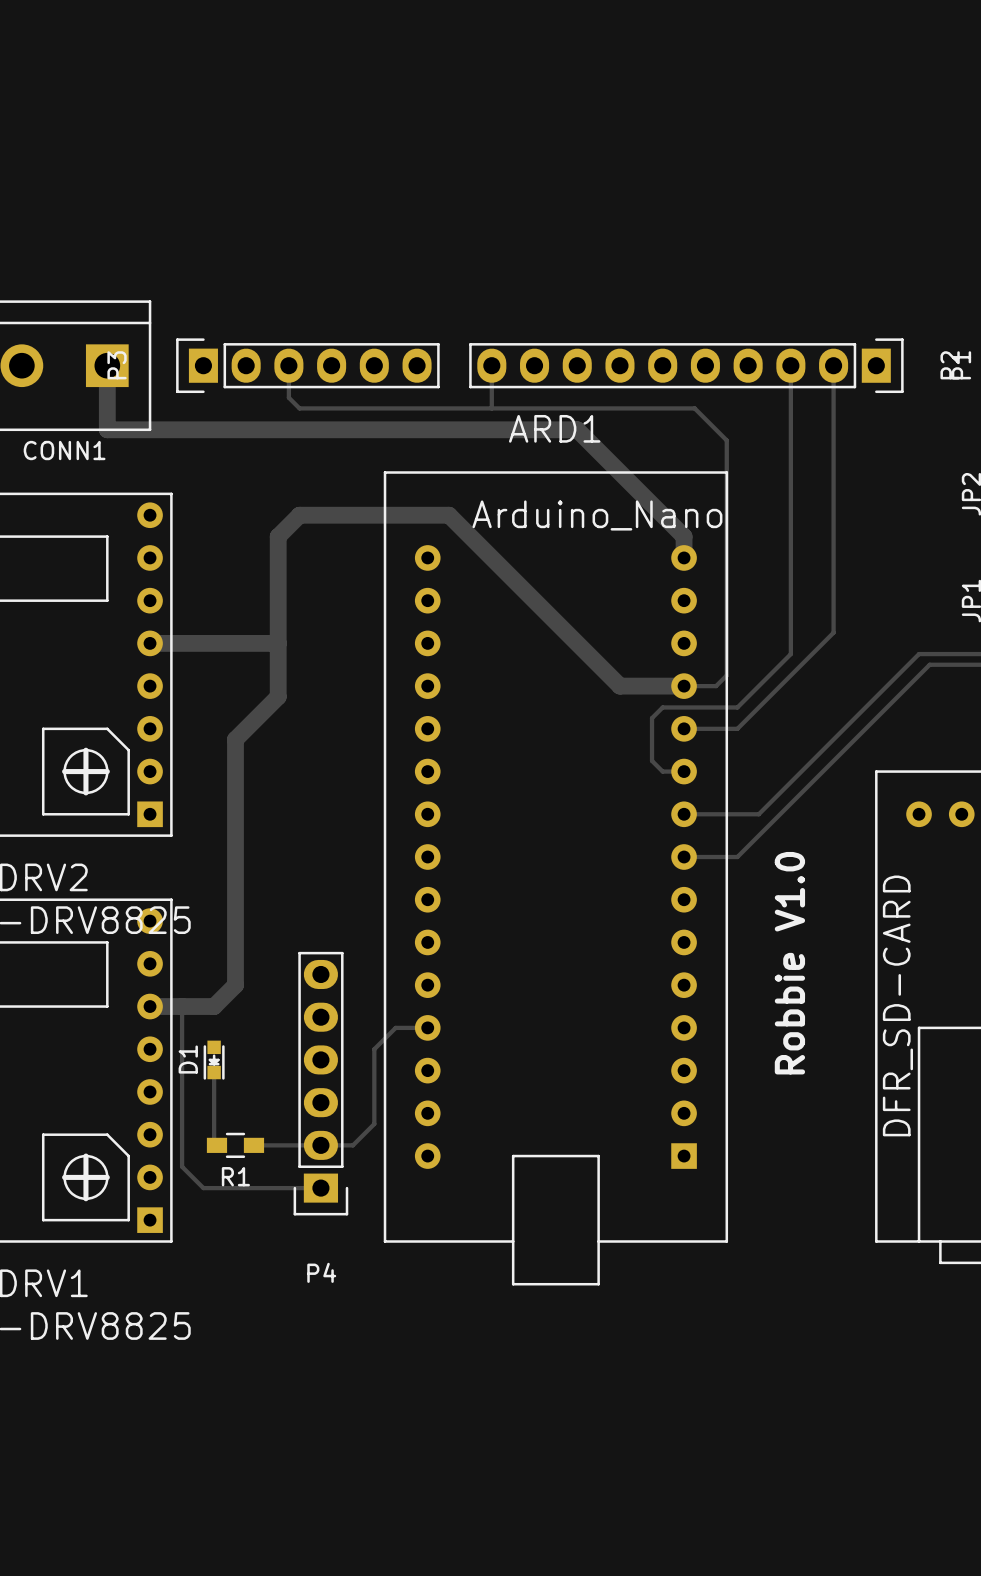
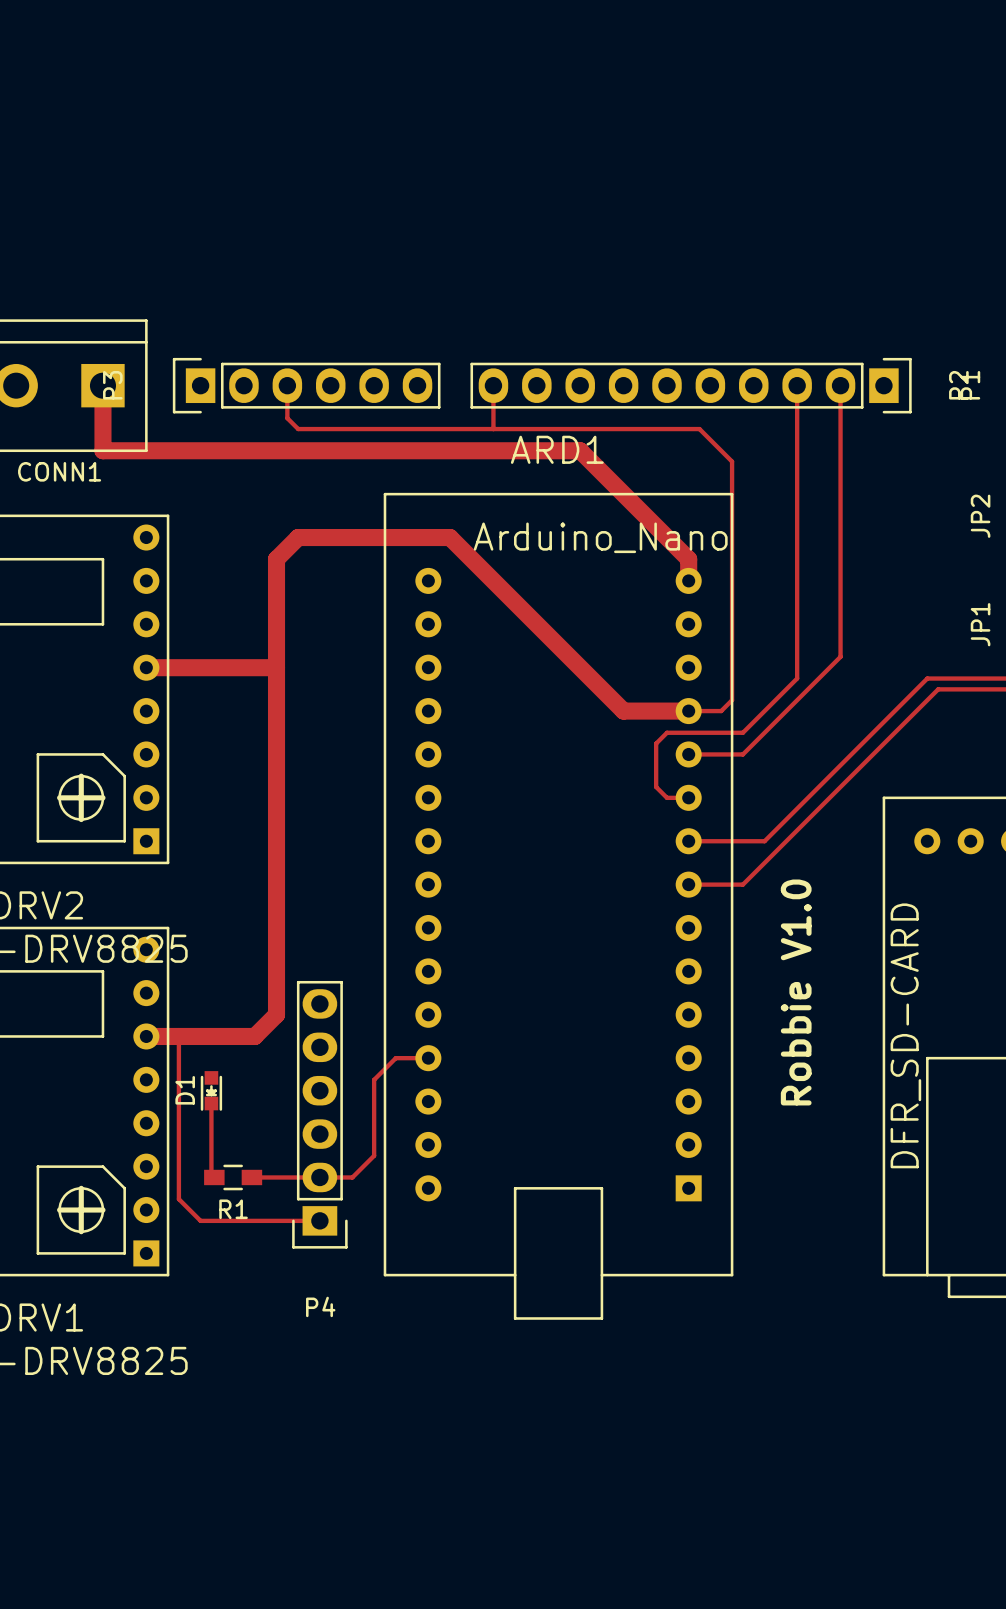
track: (278, 696) (235, 739) (235, 985) (214, 1006) -> (276, 721) (276, 1014) (254, 1036) (211, 1036)

